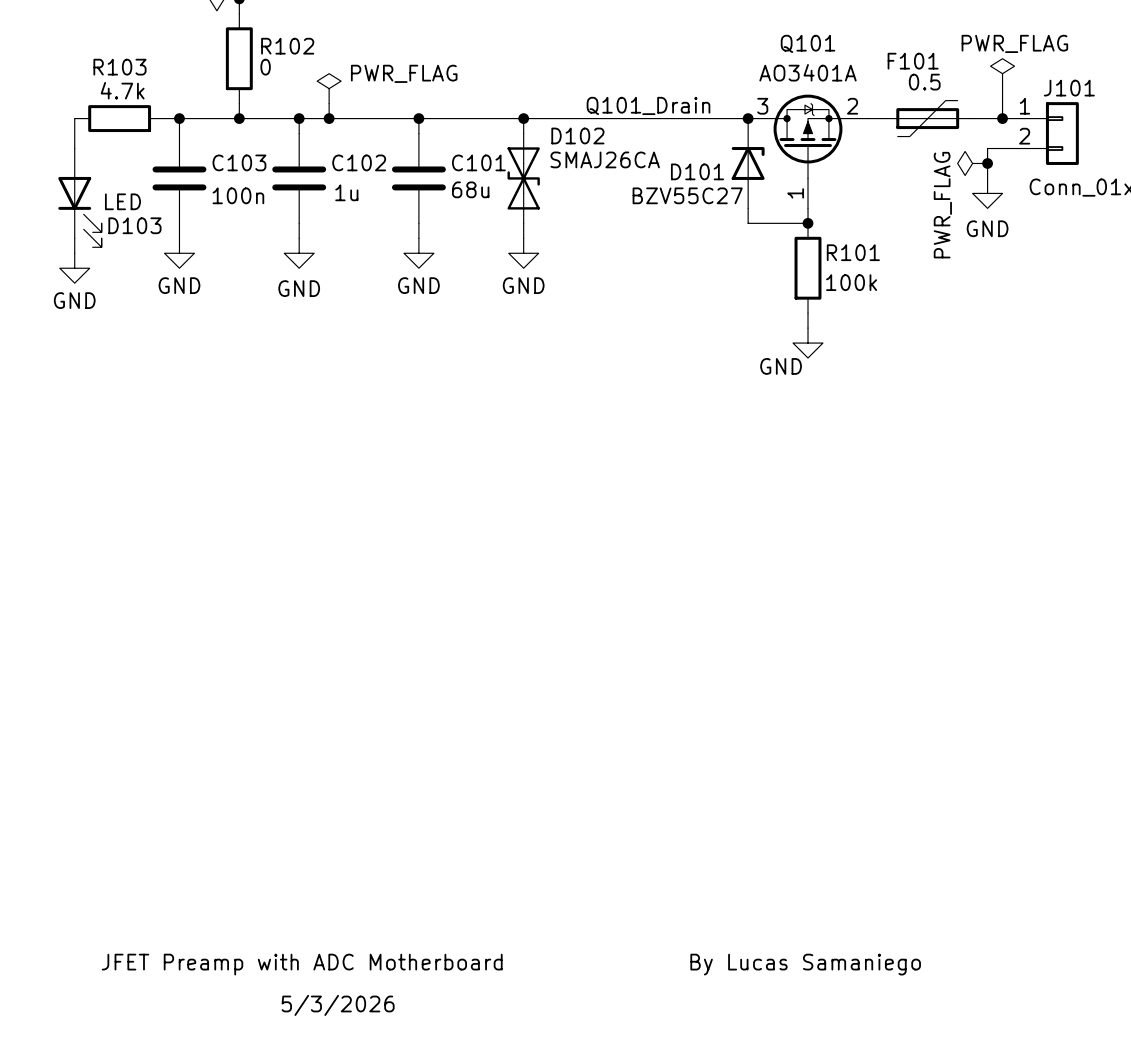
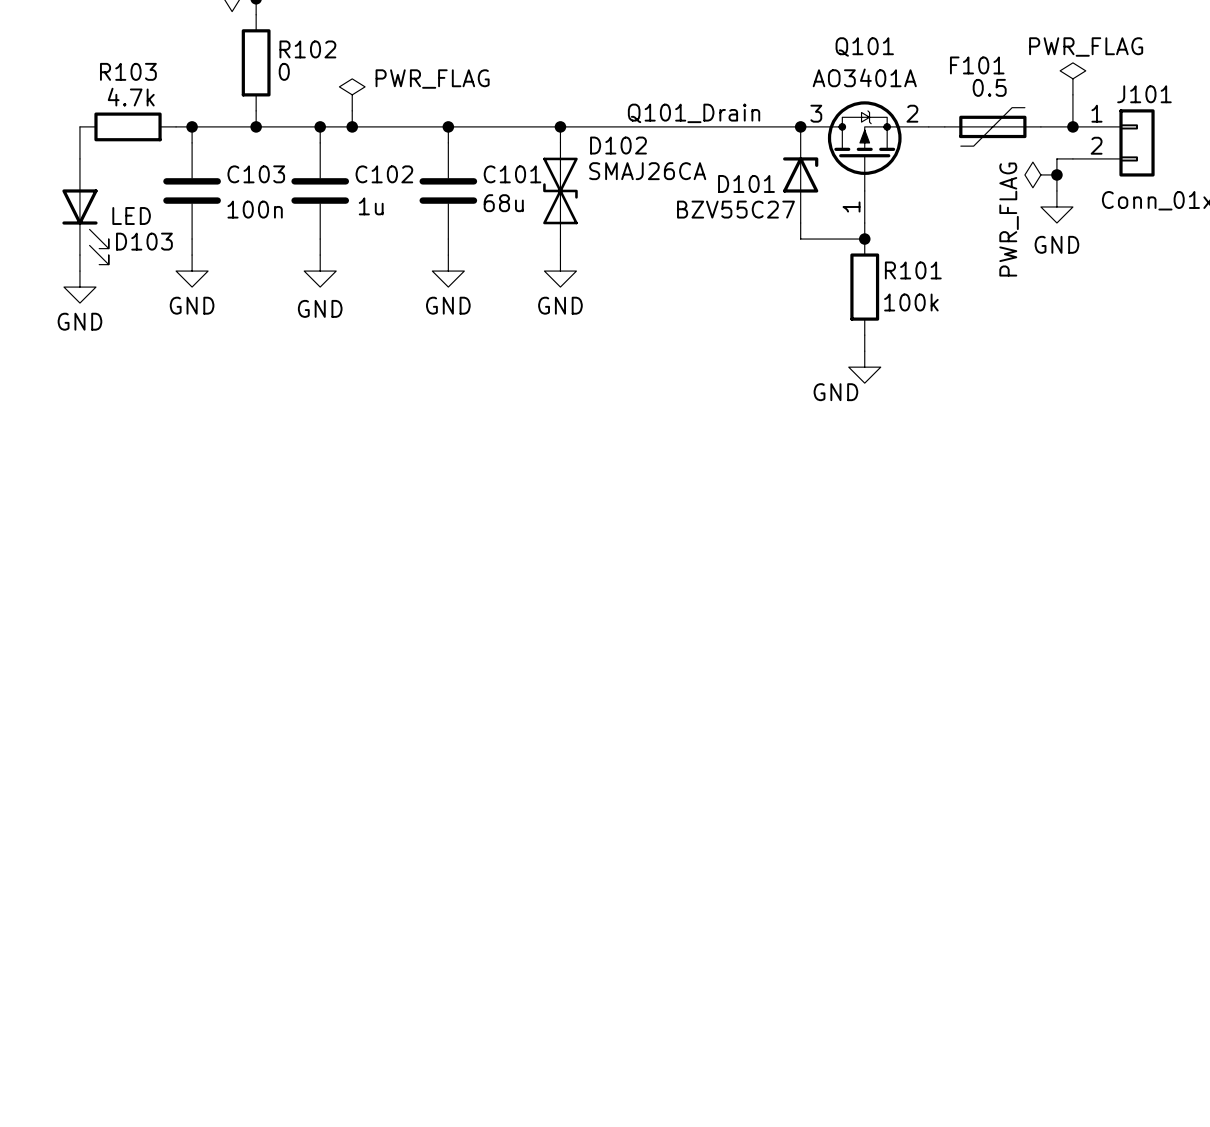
text: JFET Preamp with ADC Motherboard By Lucas Samaniego (511, 964) -> none
text: 5/3/2026 (338, 1005) -> none

